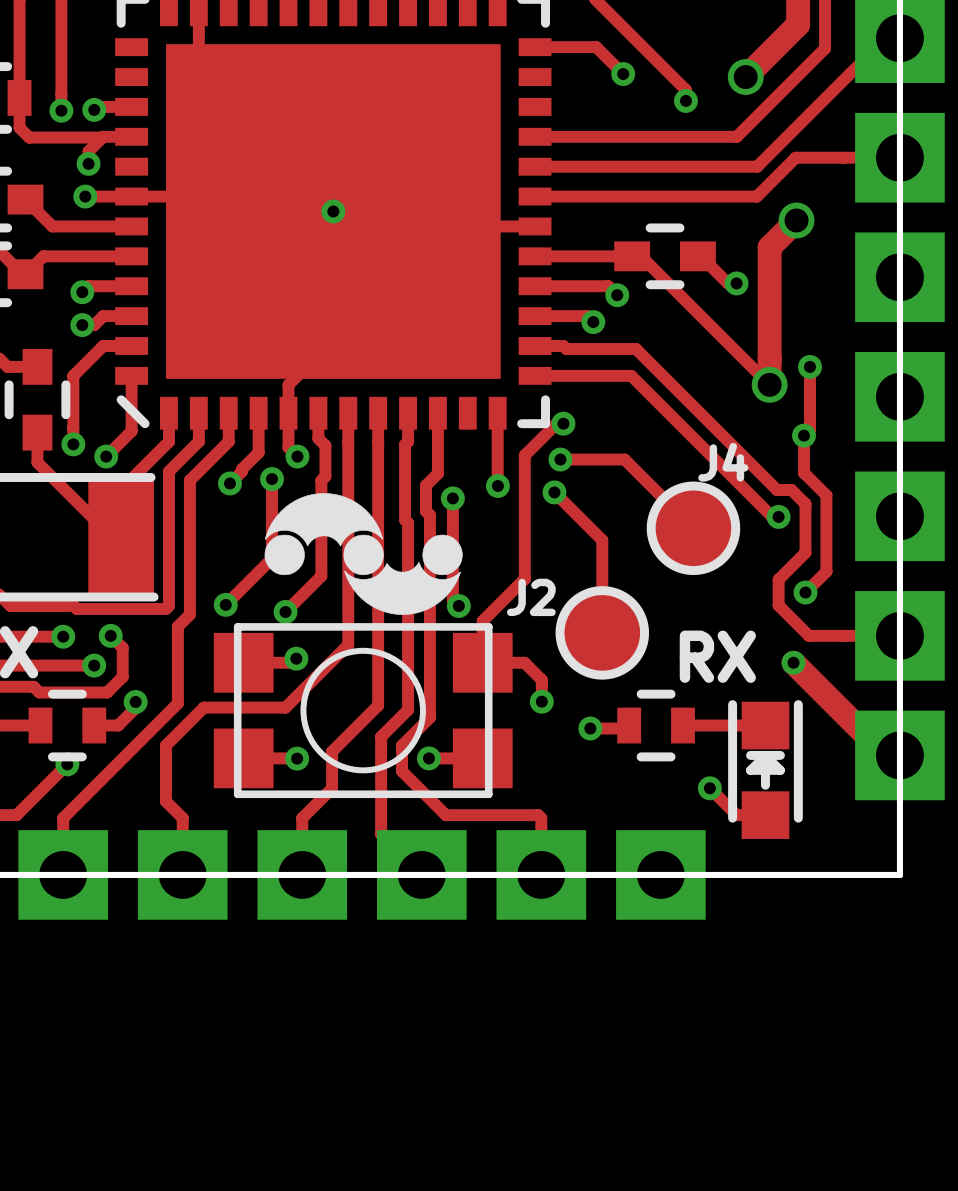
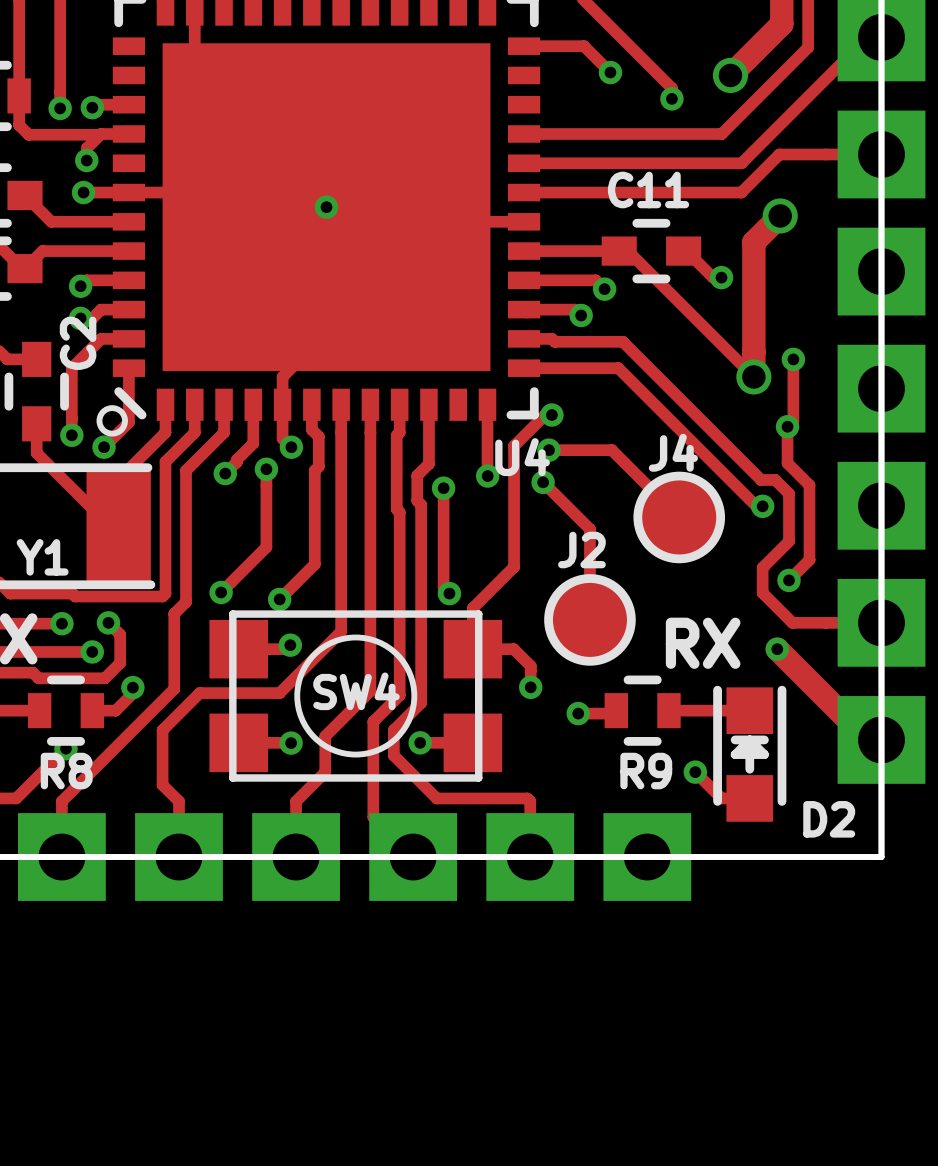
C11 name: none -> C11 (648, 189)
C2 name: none -> C2 (78, 343)
drawing: none -> [96, 405, 128, 437]
J4 name position: J4 (723, 462) -> J4 (673, 452)
U4 name: none -> U4 (522, 457)
drawing: [264, 493, 463, 615] -> none
Y1 name: none -> Y1 (42, 557)
J2 name position: J2 (531, 597) -> J2 (581, 550)
SW4 name: none -> SW4 (356, 691)
R8 name: none -> R8 (66, 771)
R9 name: none -> R9 (646, 771)
D2 name: none -> D2 (829, 819)

